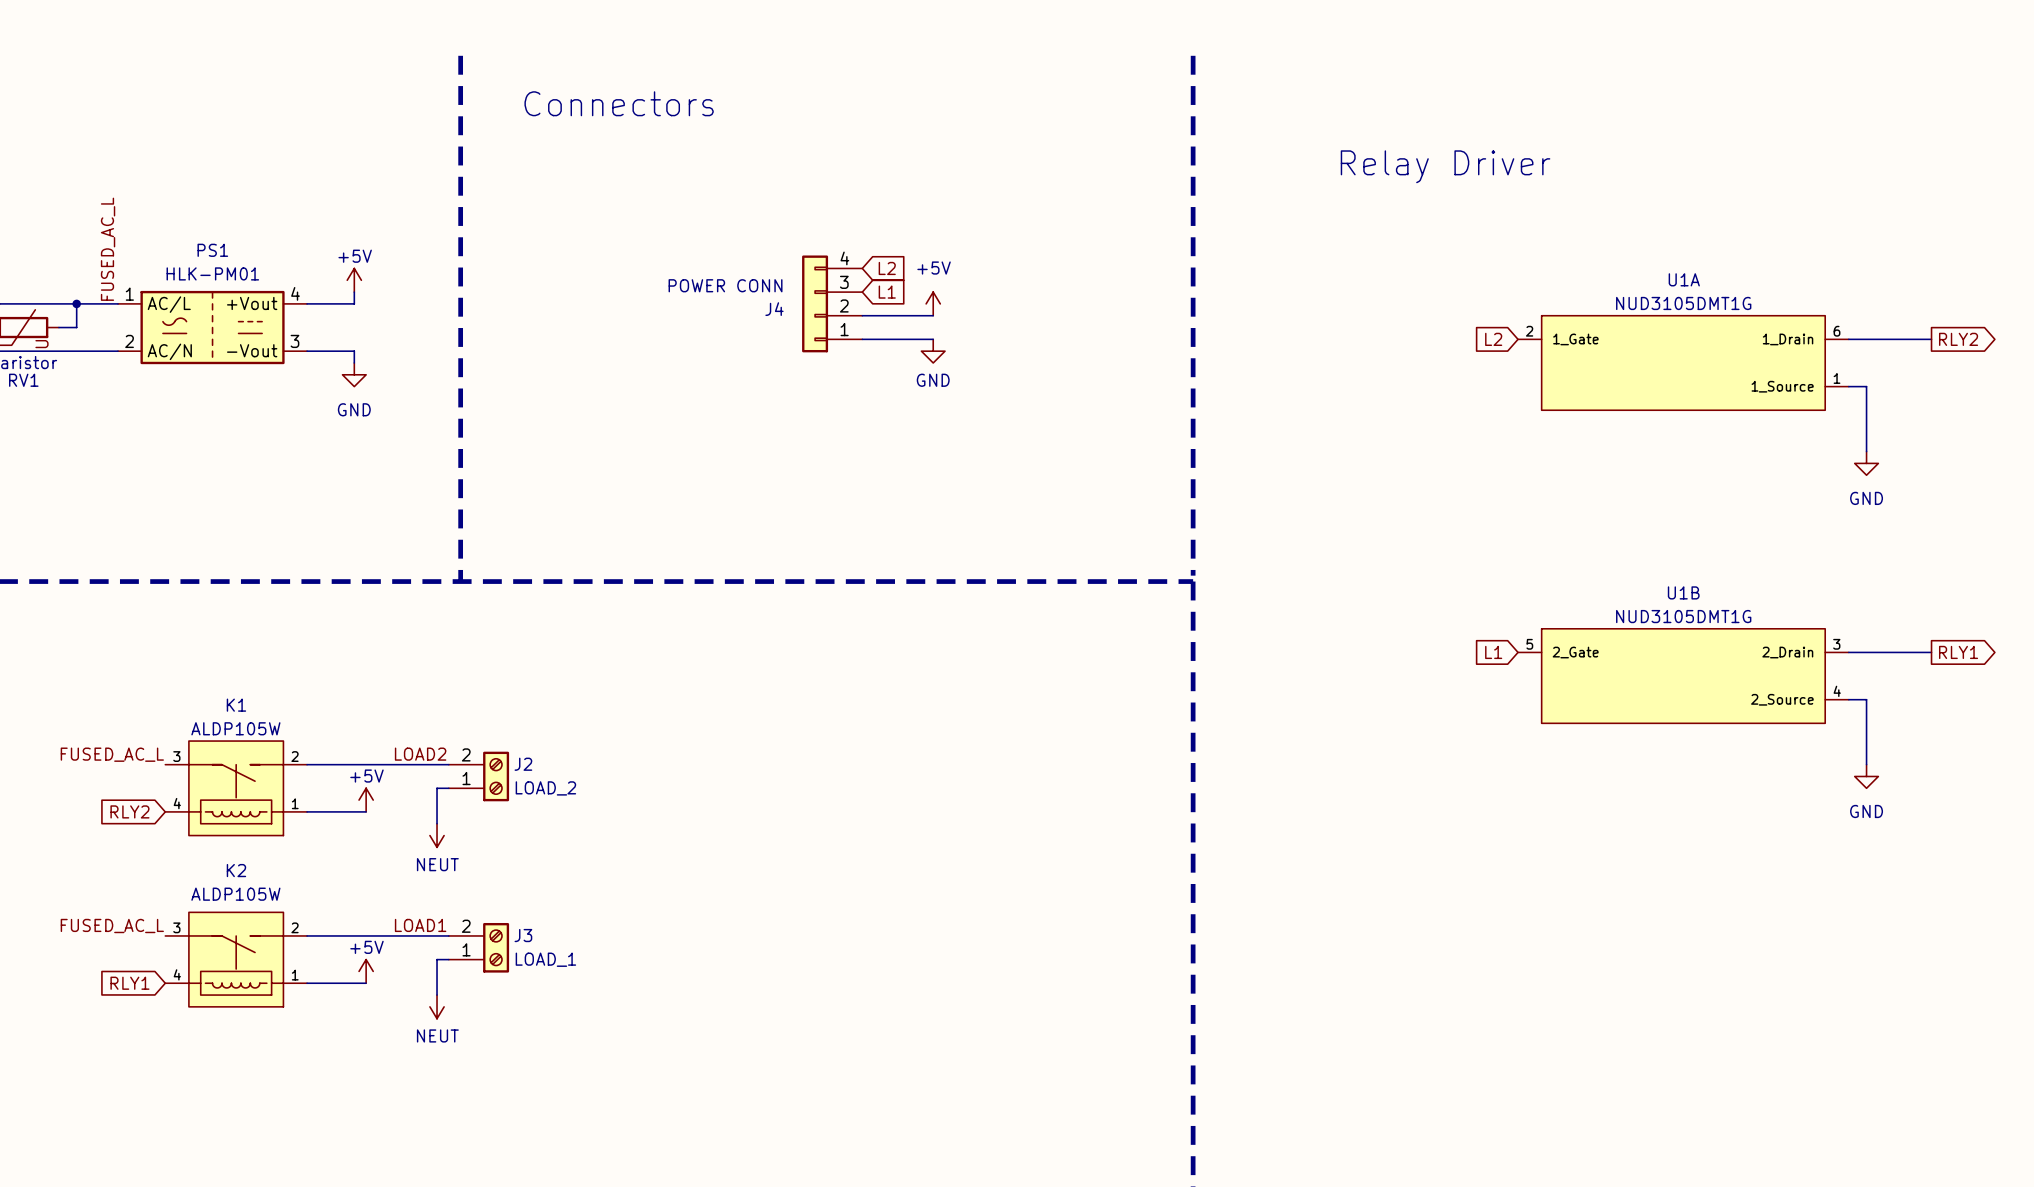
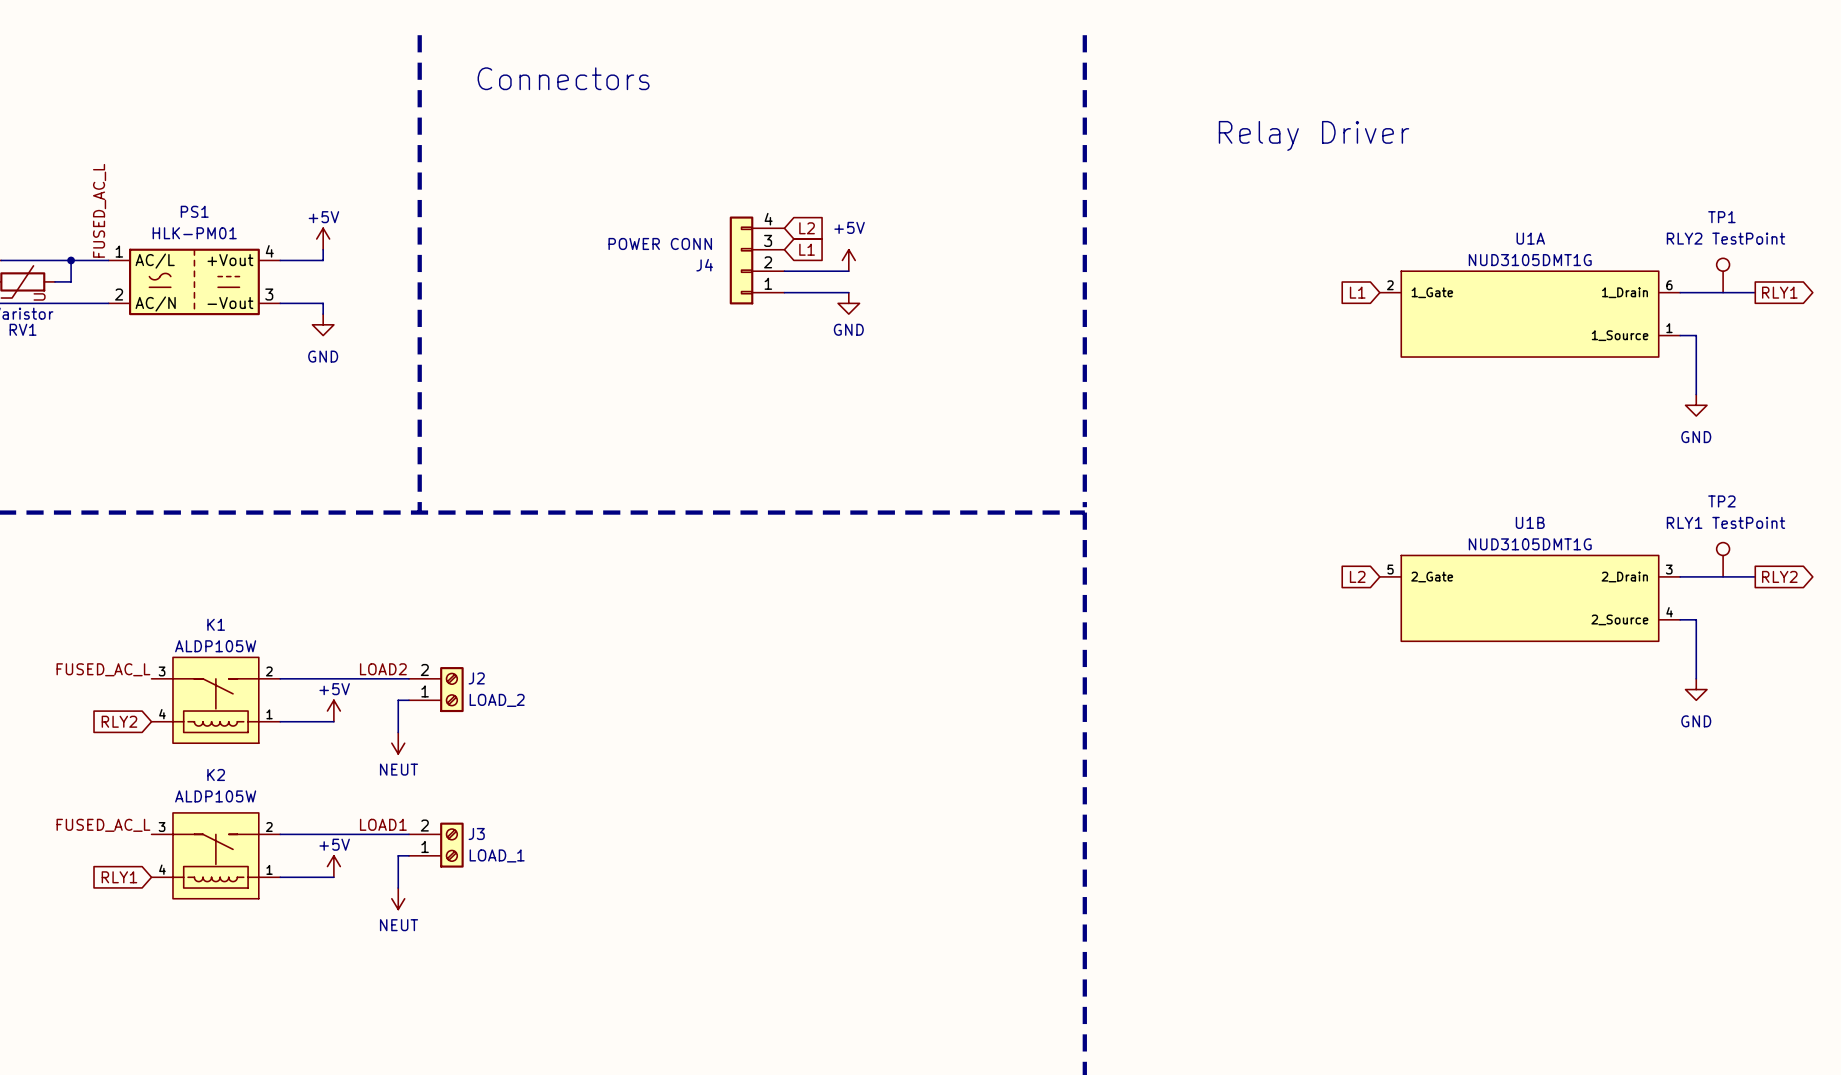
TP1: none -> RLY2 TestPoint (1723, 275)
global label: L2 (1493, 339) -> L1 (1357, 292)
global label: RLY2 (1958, 339) -> RLY1 (1779, 292)
TP2: none -> RLY1 TestPoint (1723, 559)
global label: L1 (1493, 652) -> L2 (1357, 576)
global label: RLY1 (1958, 652) -> RLY2 (1779, 576)

